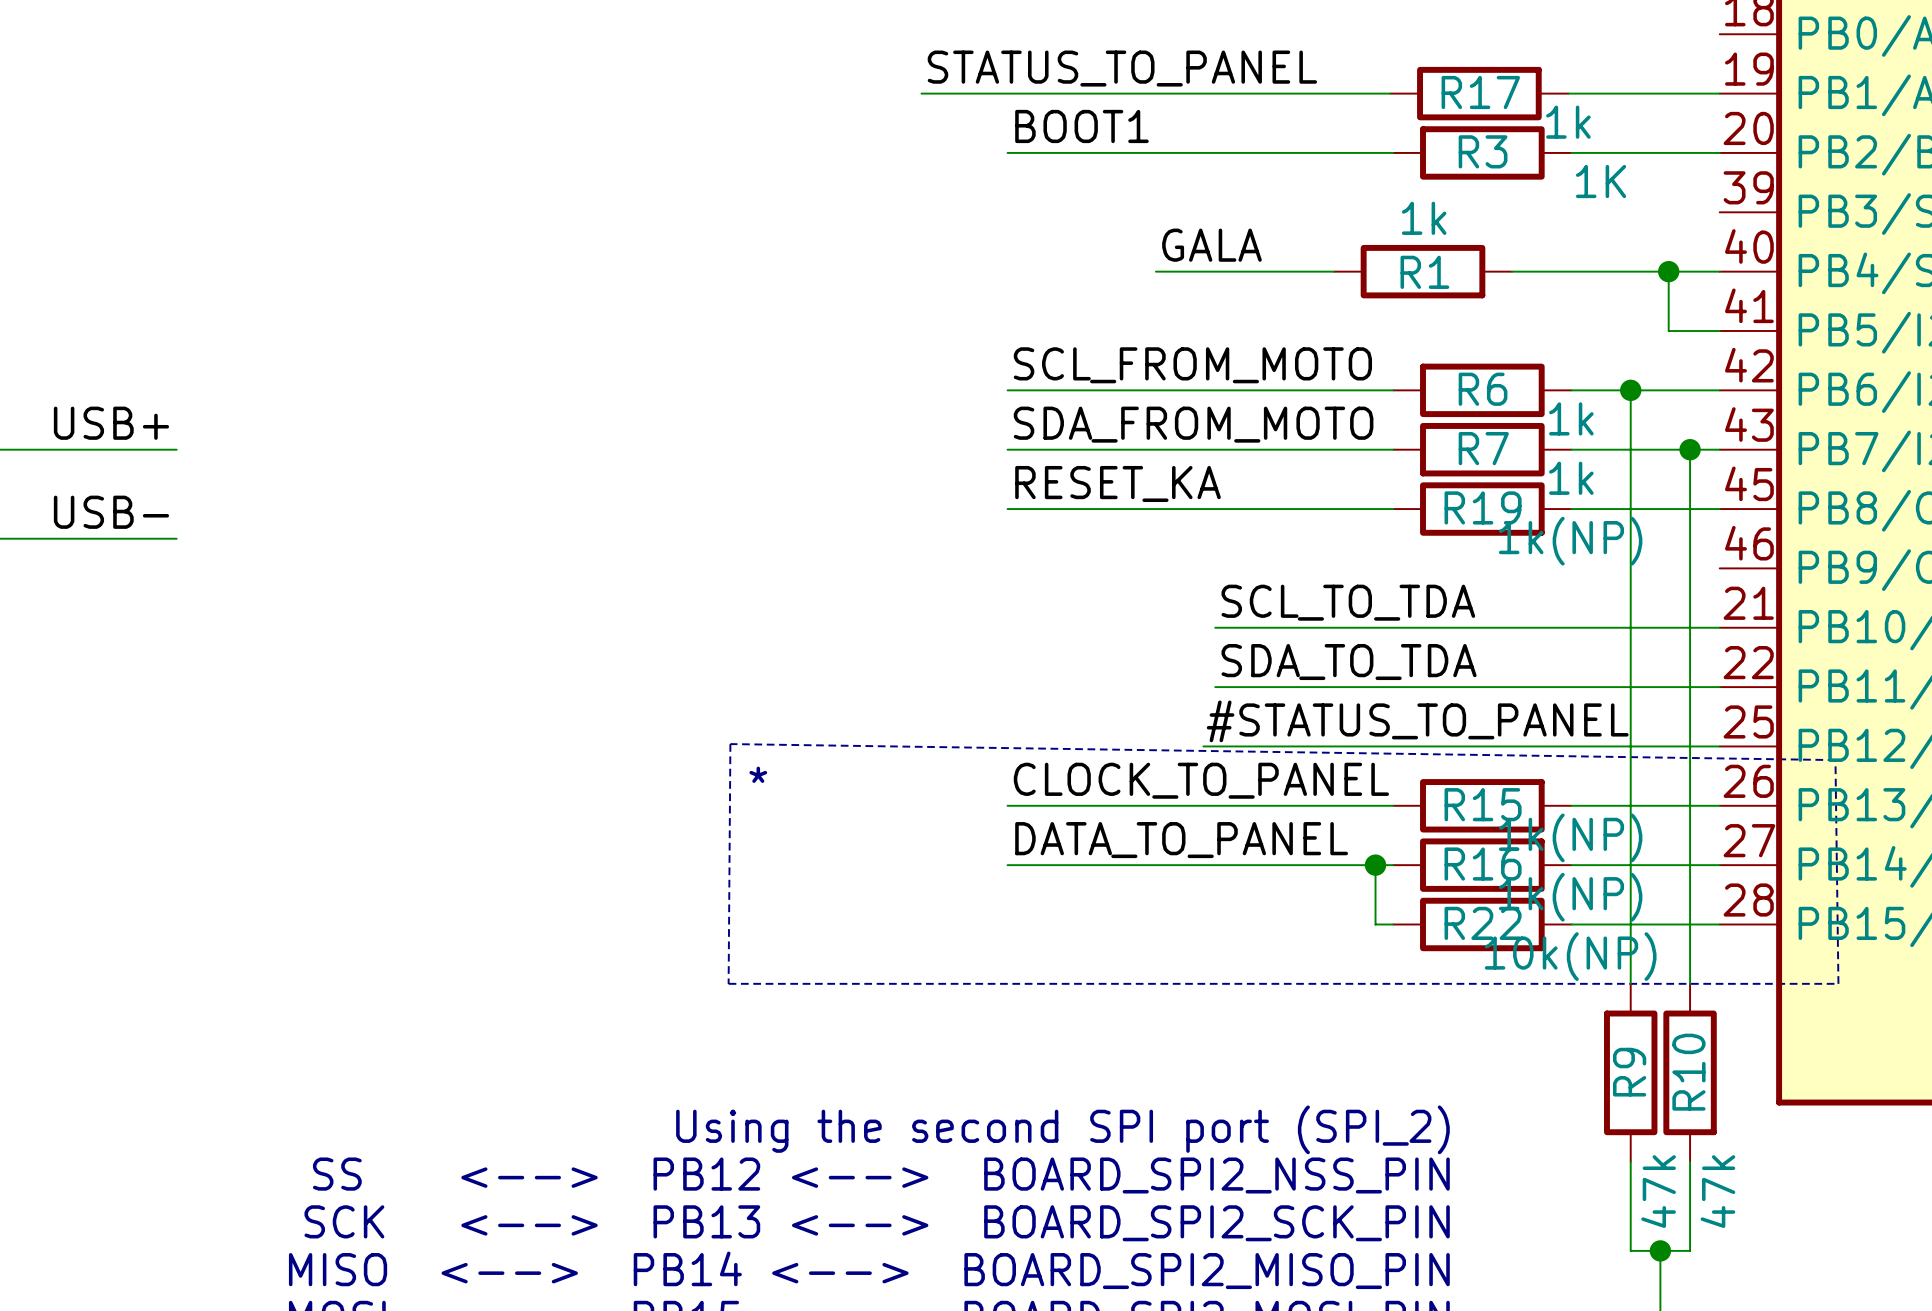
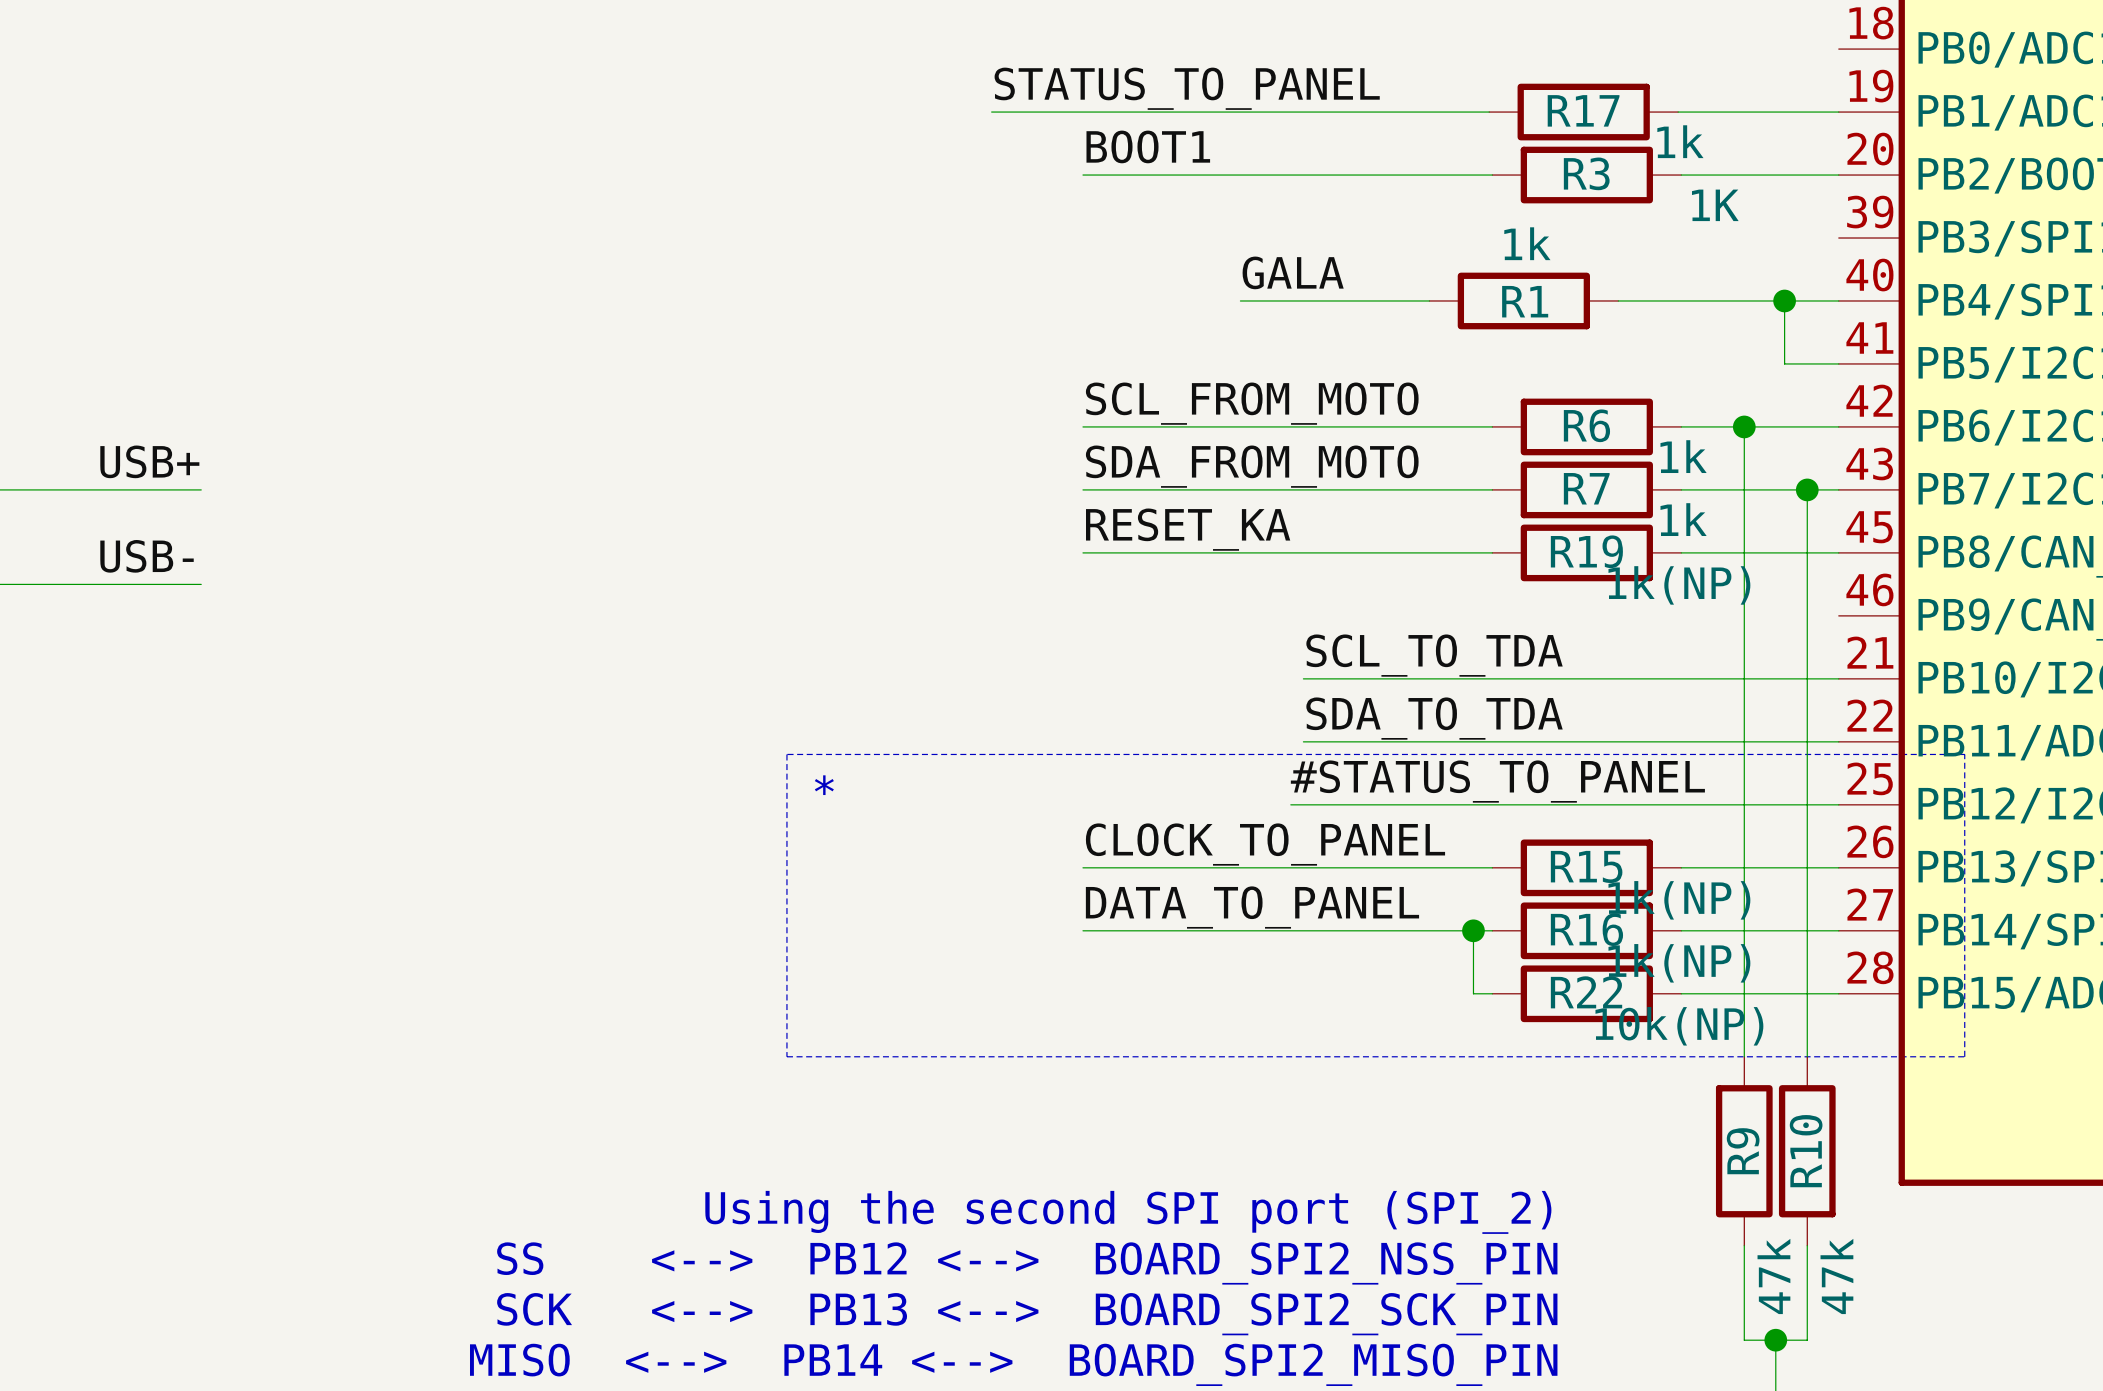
text position: * (758, 774) -> * (824, 785)
line: (728, 983) (730, 744) (1835, 760) (1838, 983) -> (786, 1056) (786, 754) (1964, 754) (1964, 1056)

